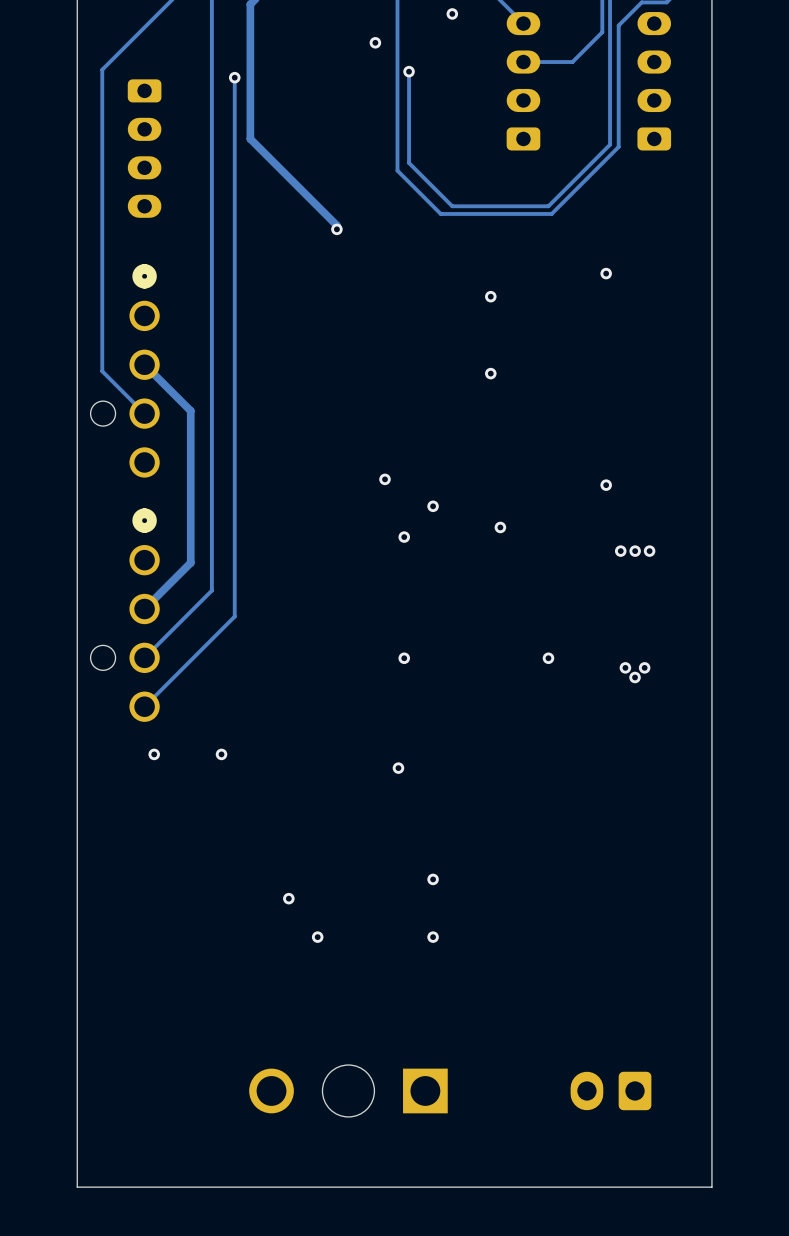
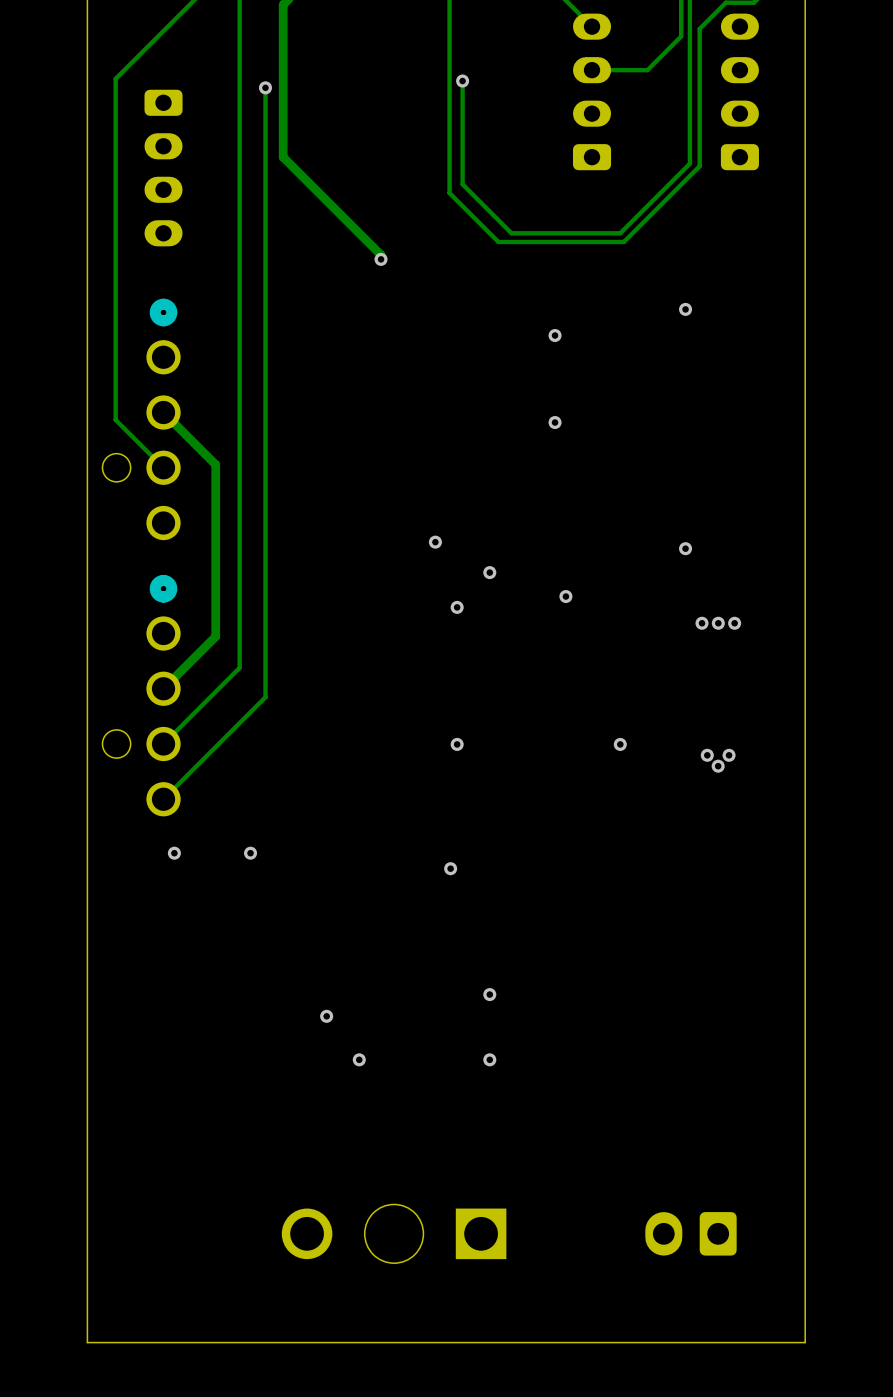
via: (452, 13) -> none
via: (375, 42) -> none

